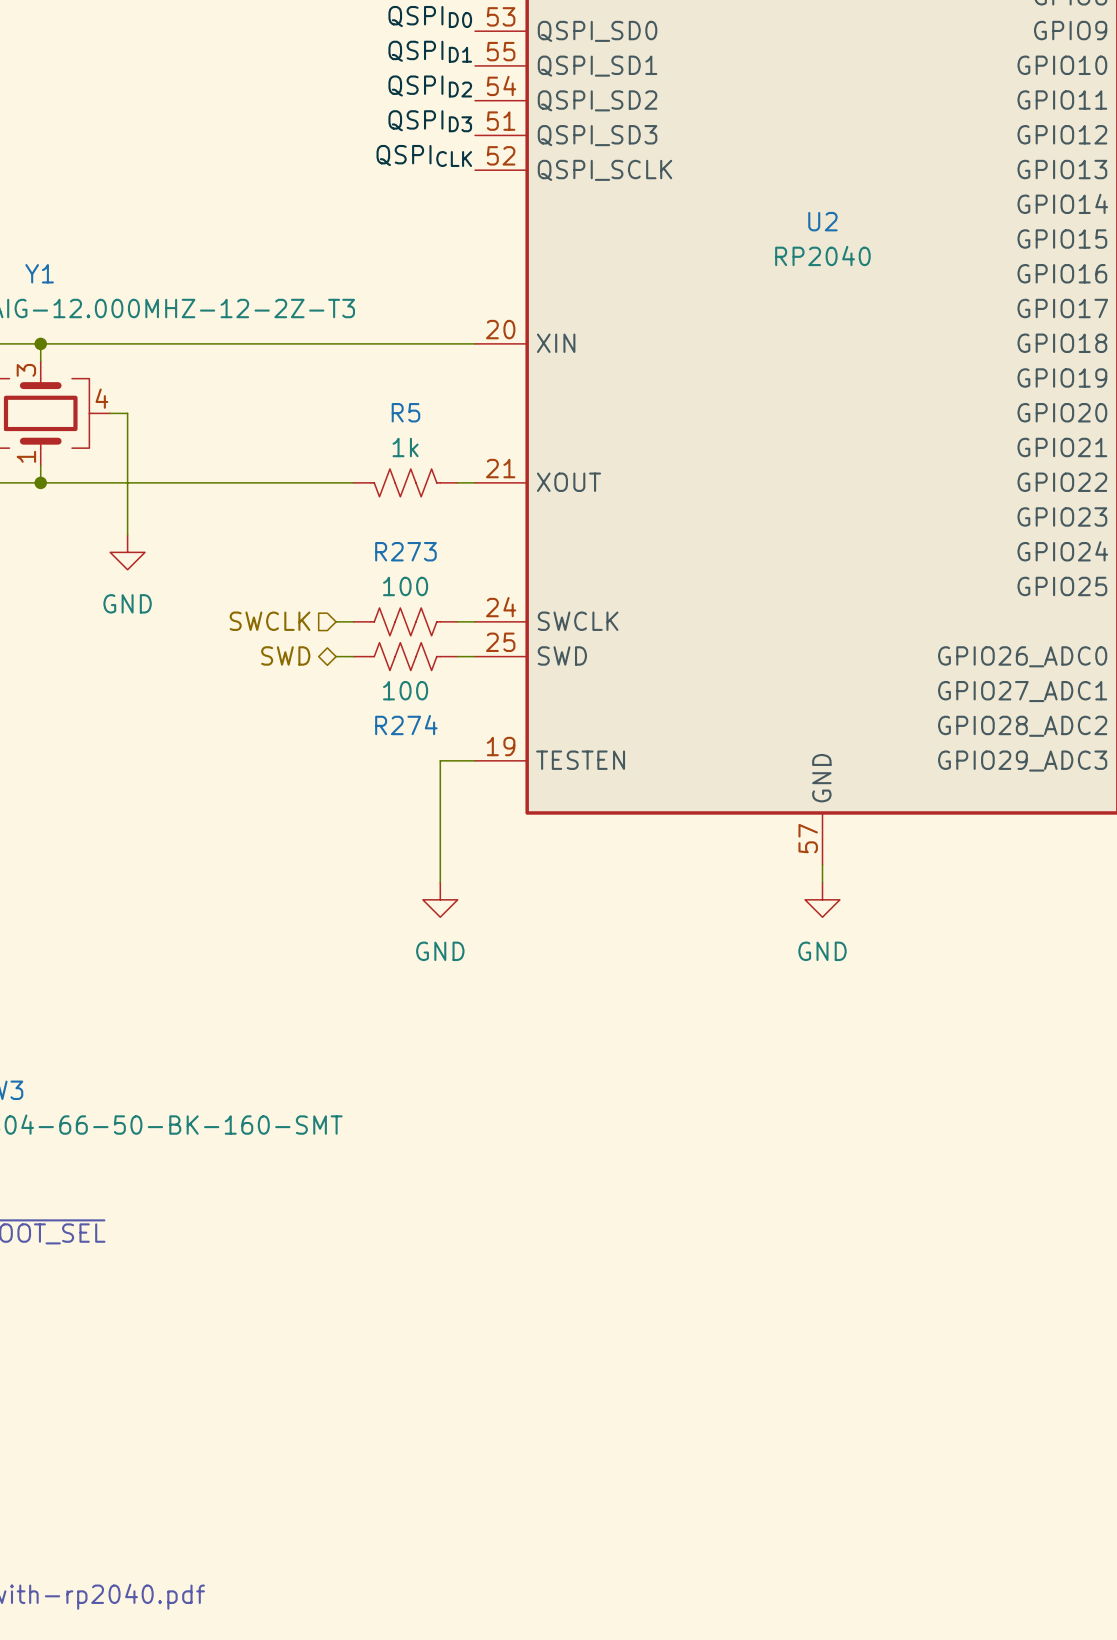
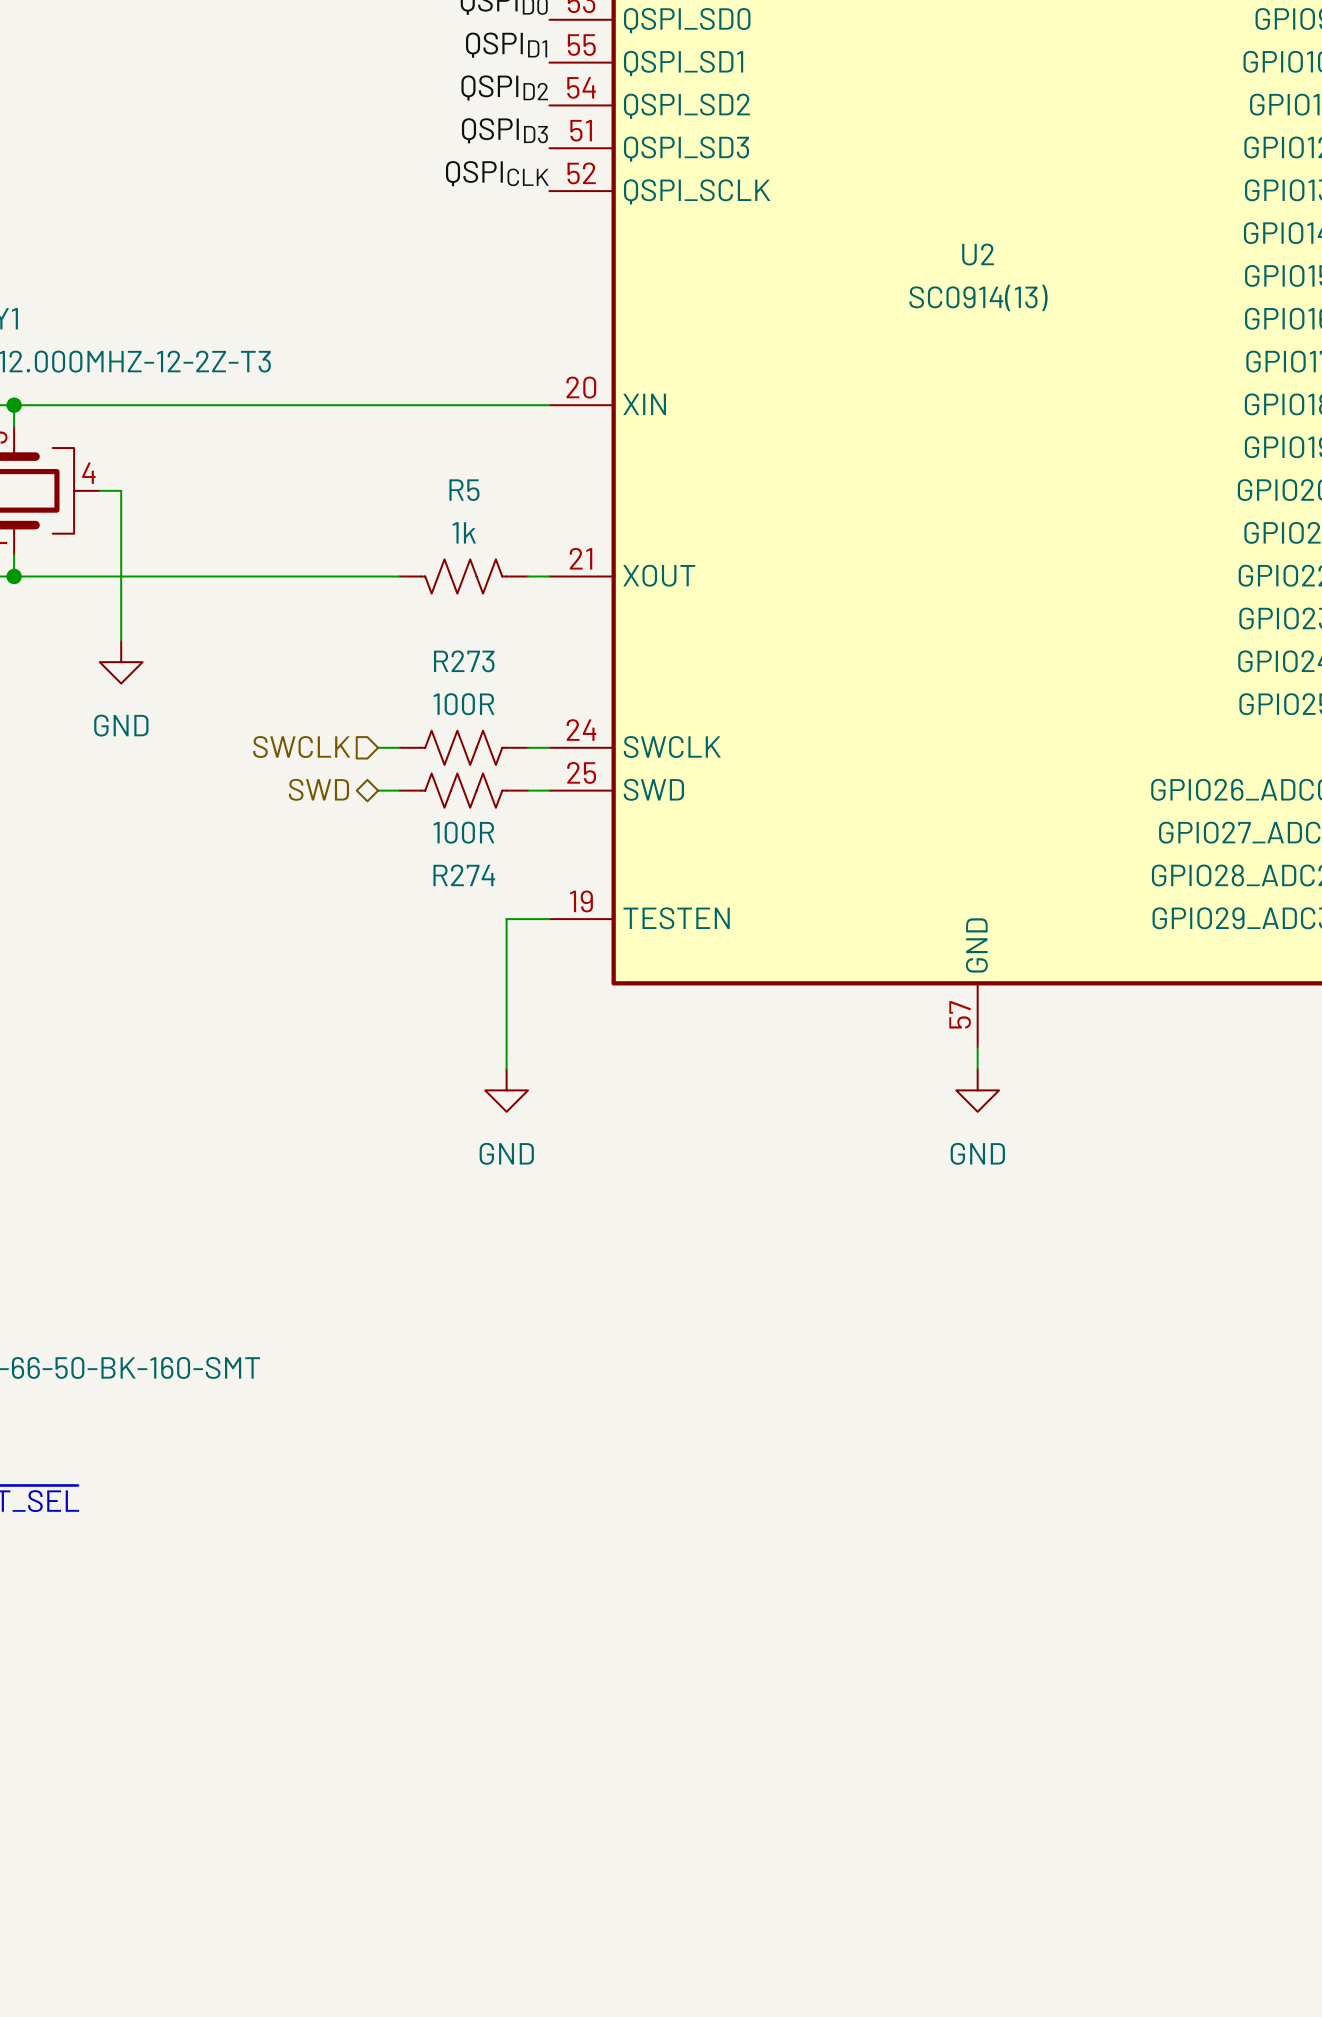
U2 value: RP2040 (822, 255) -> SC0914(13) (978, 297)
R273 value: 100 (405, 586) -> 100R (463, 704)
R274 value: 100 (405, 690) -> 100R (463, 832)

